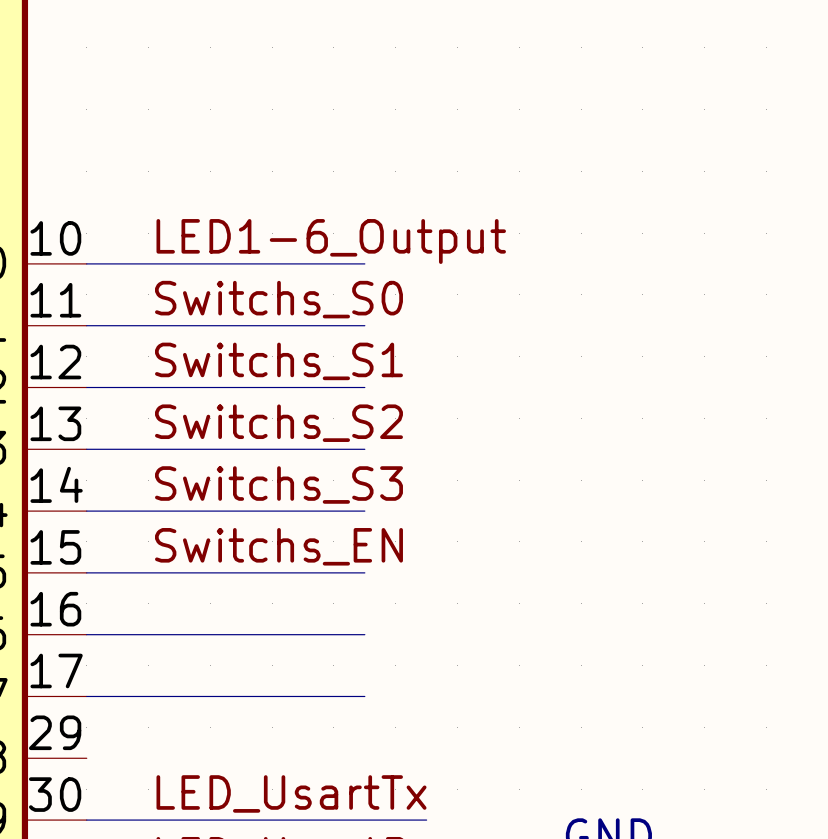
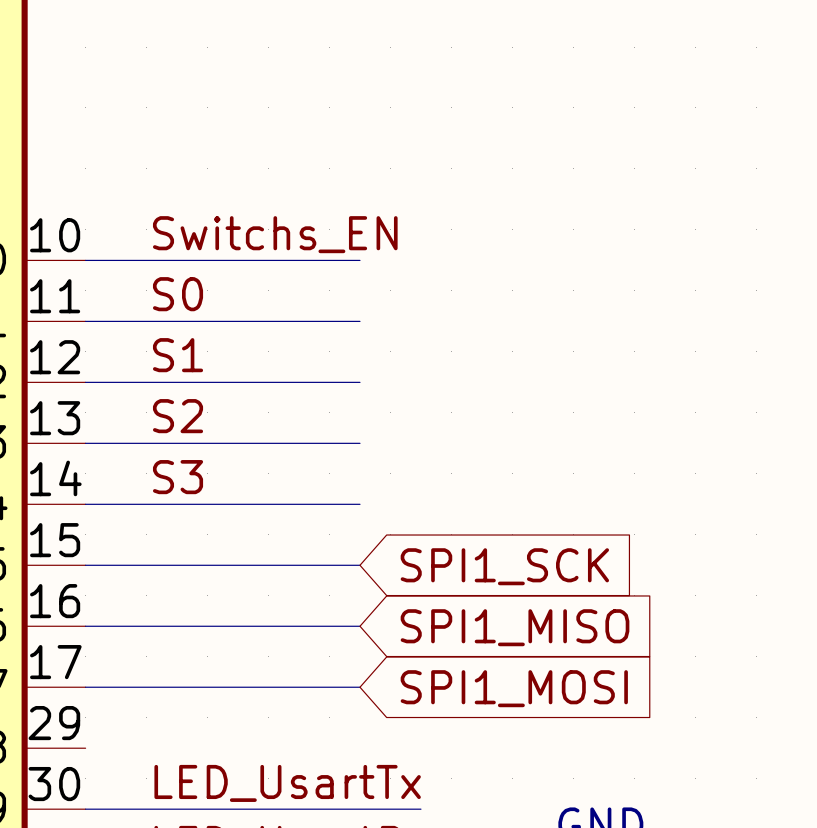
label: LED1-6_Output (331, 241) -> Switchs_EN (275, 234)
label: Switchs_S0 (278, 299) -> S0 (178, 294)
label: Switchs_S1 (278, 361) -> S1 (178, 355)
label: Switchs_S2 (278, 423) -> S2 (178, 416)
label: Switchs_S3 (278, 484) -> S3 (178, 477)
label: Switchs_EN (278, 546) -> none
global label: none -> SPI1_SCK (504, 566)
global label: none -> SPI1_MISO (515, 627)
global label: none -> SPI1_MOSI (514, 688)

